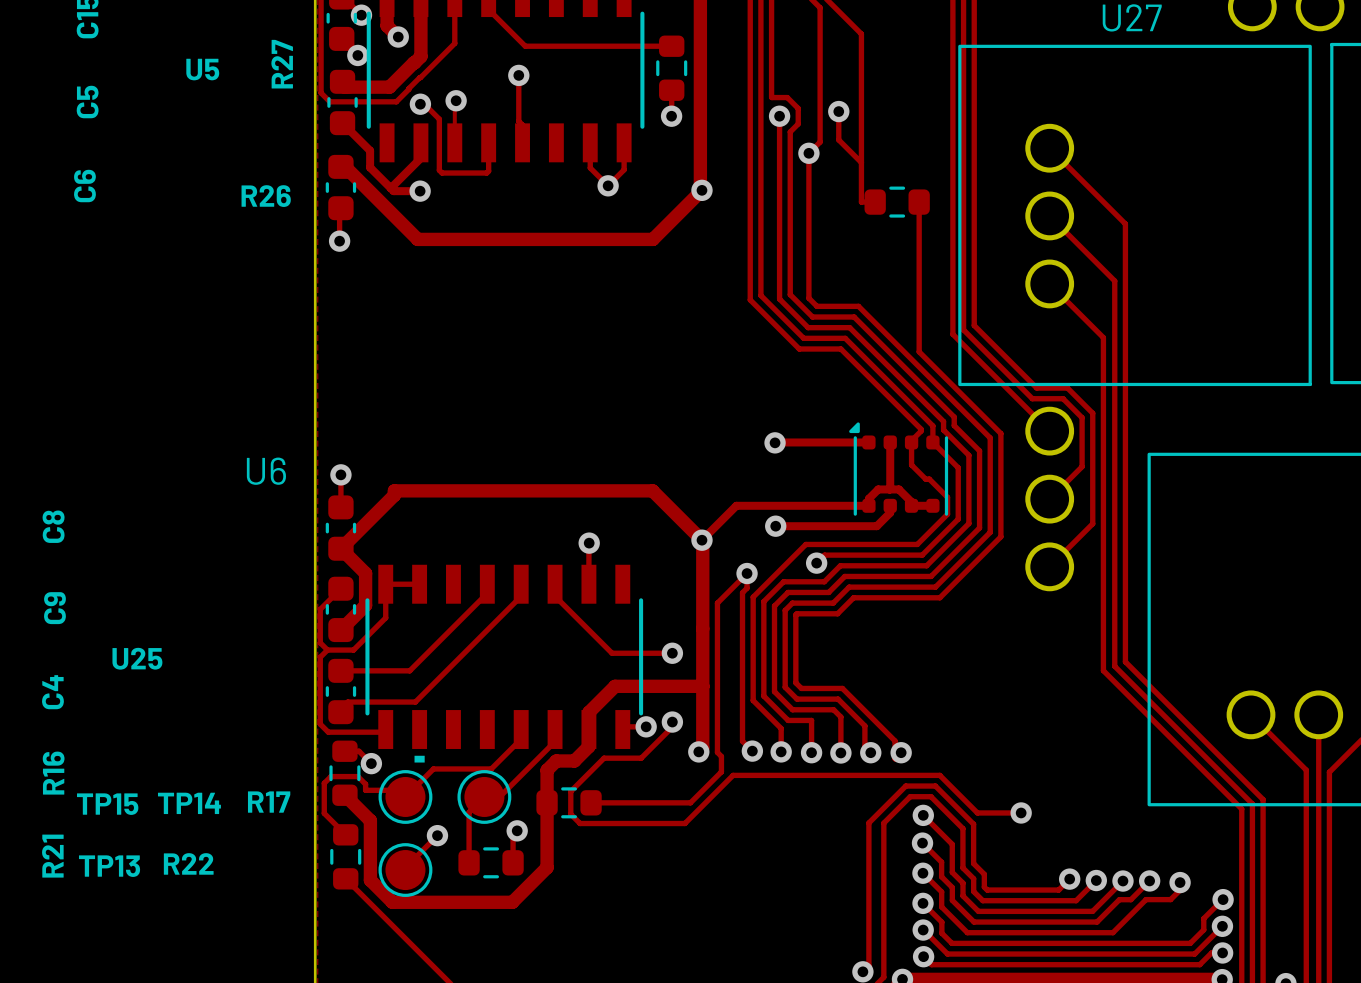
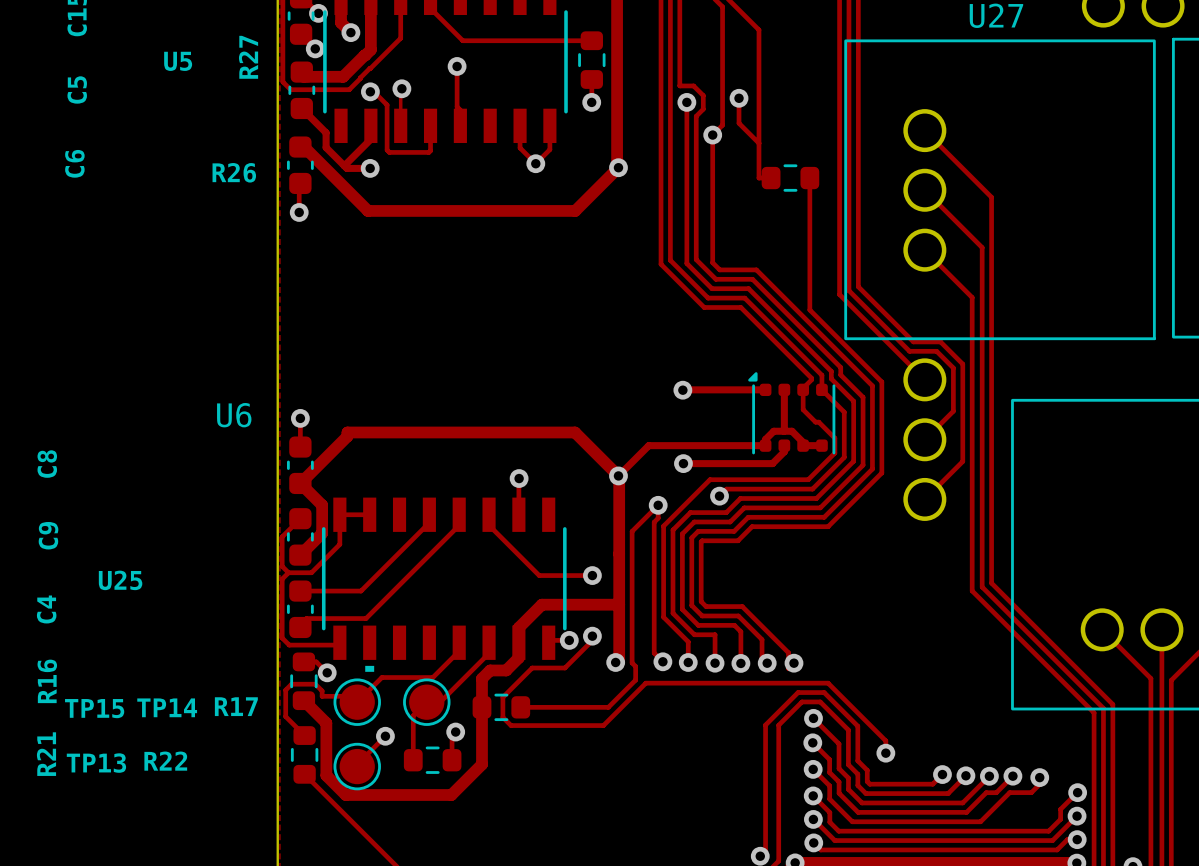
track: (977, 812) (1021, 812) -> (861, 716) (885, 740) (885, 753)
via position: (1021, 812) -> (885, 753)

